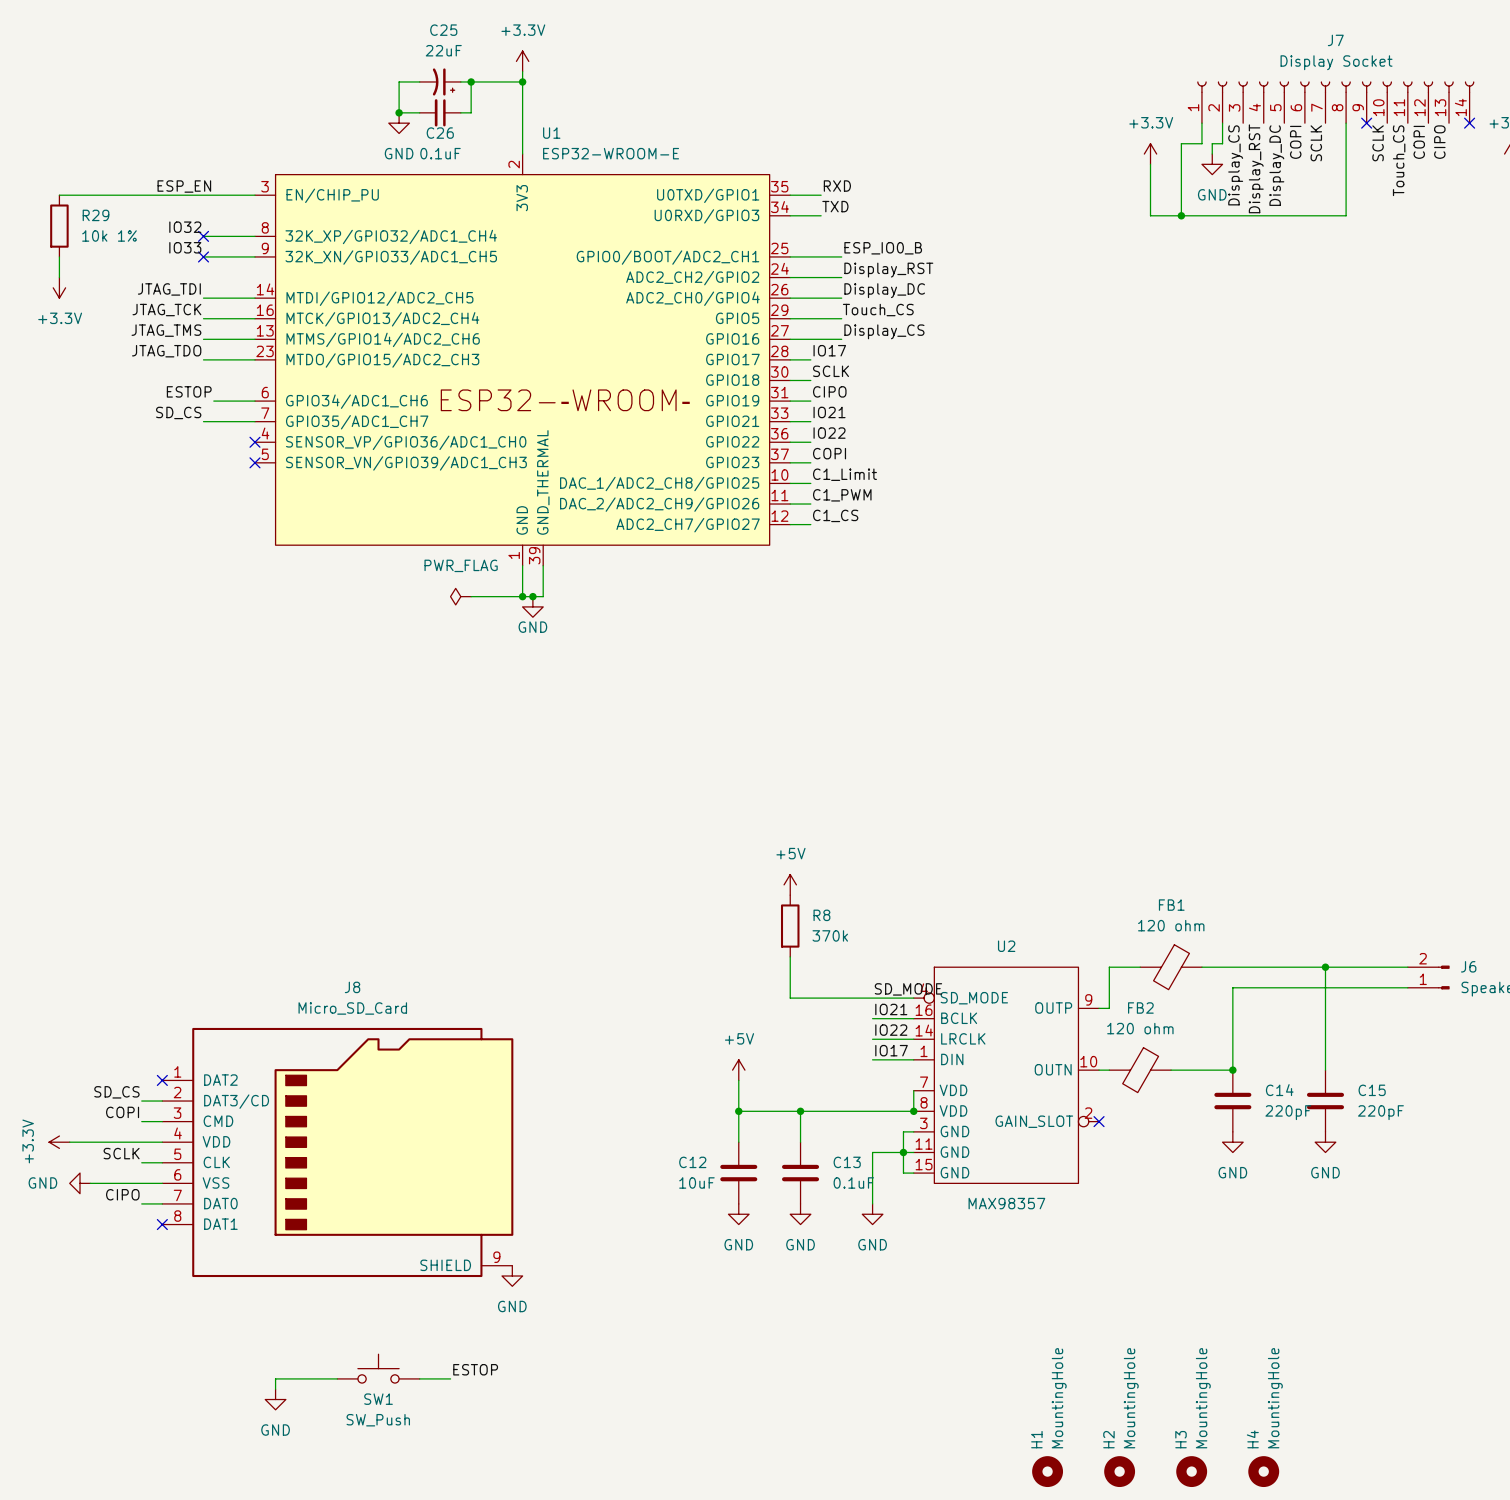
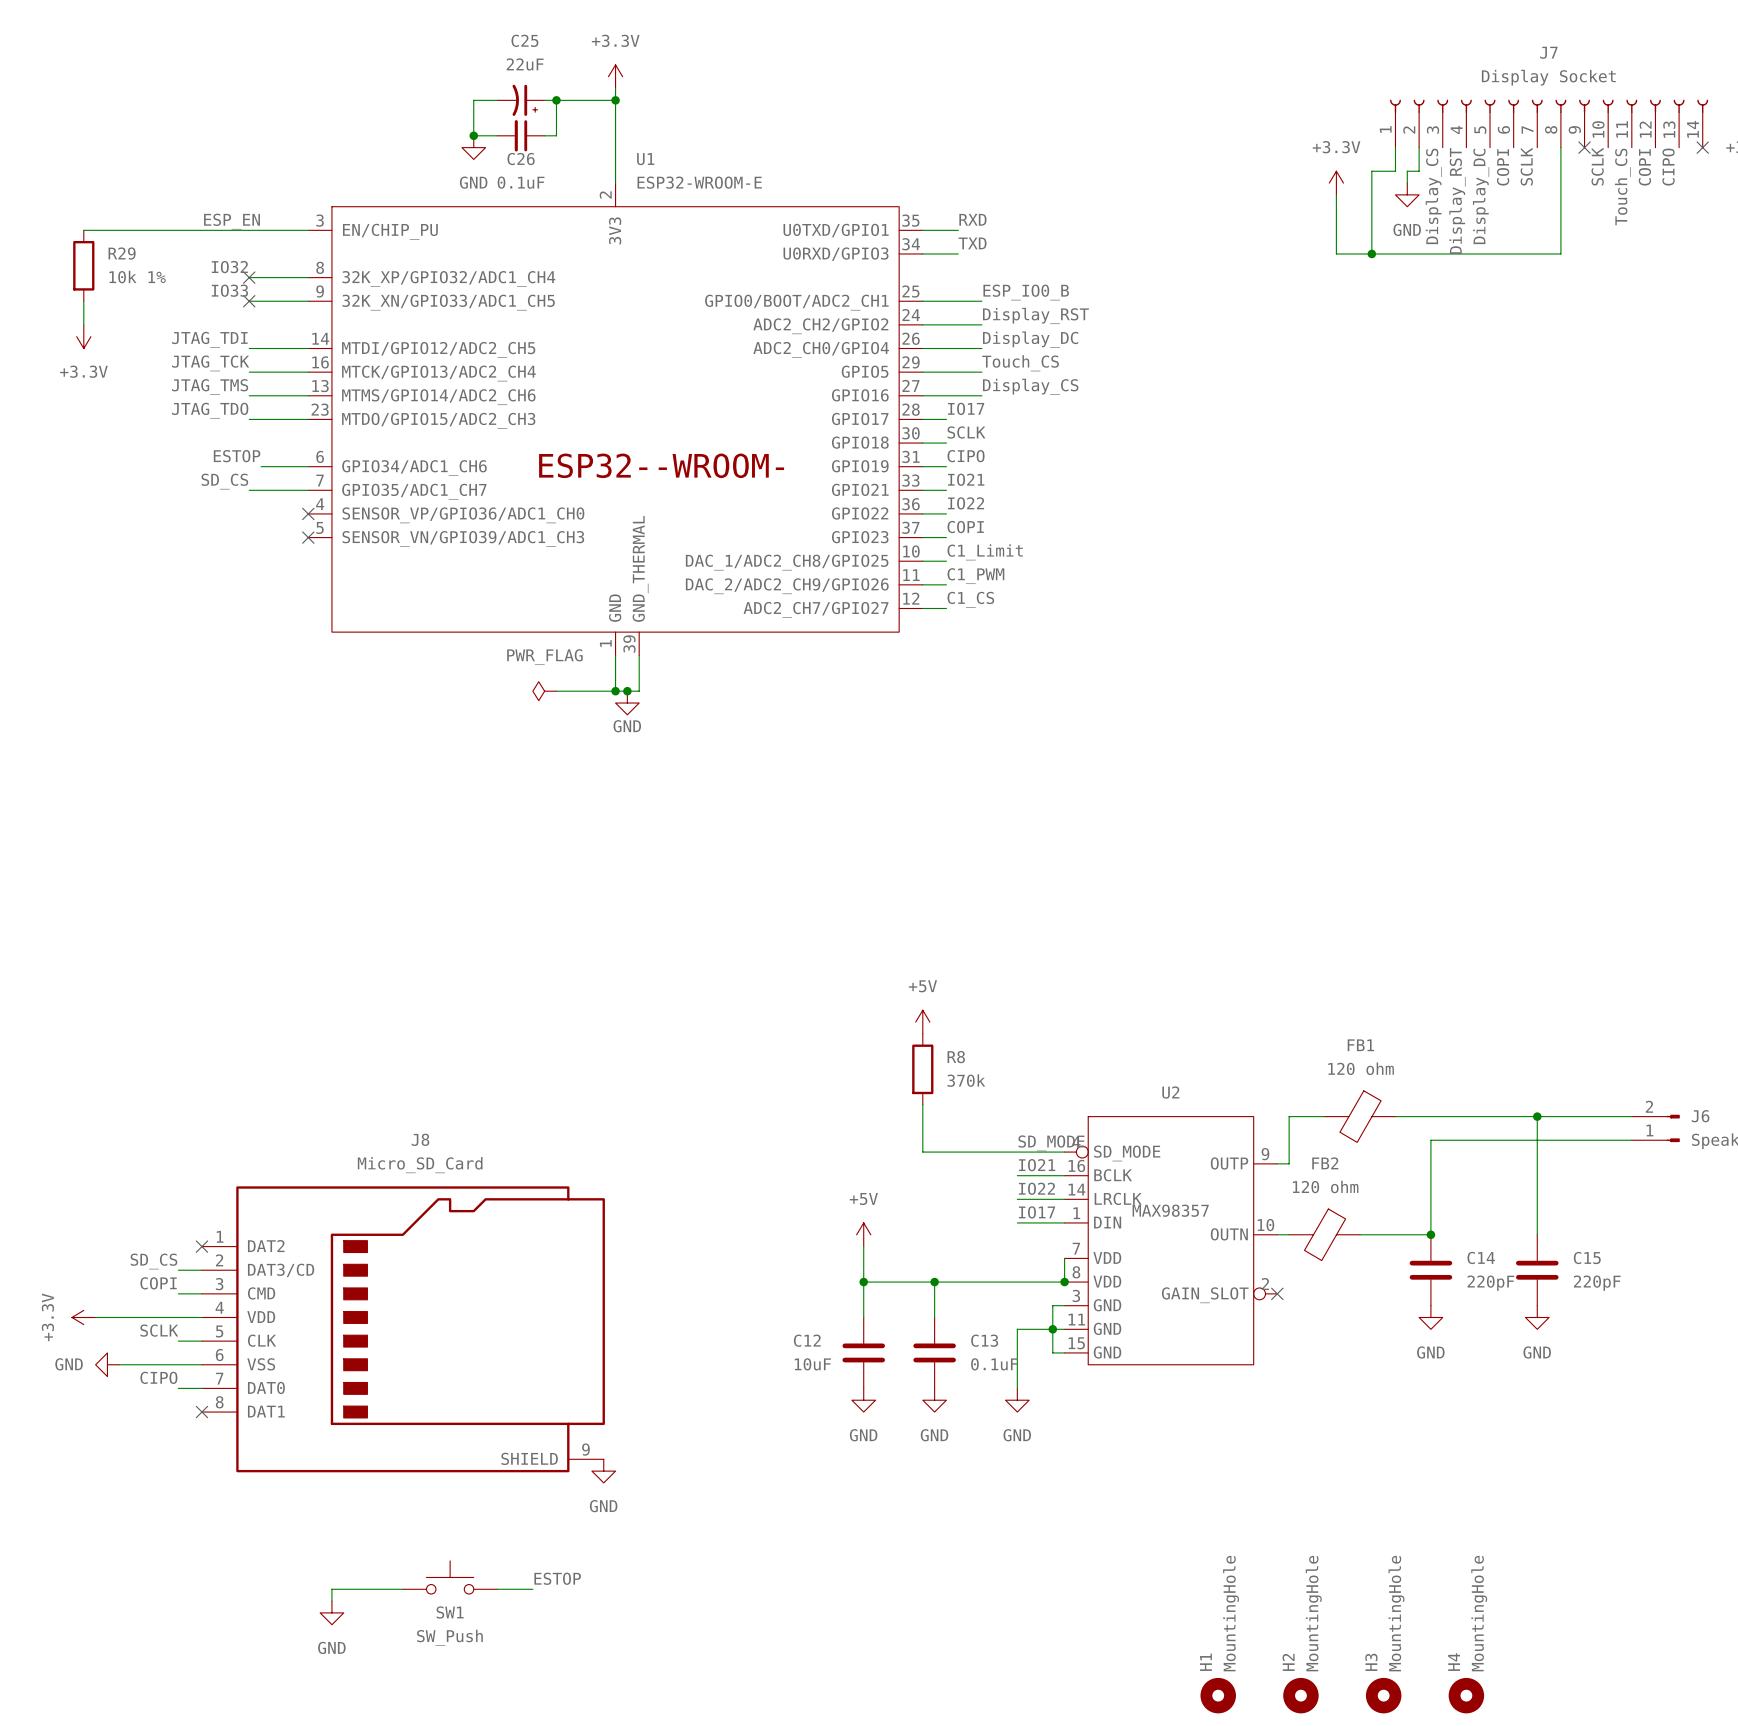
U2 value position: MAX98357 (1006, 1203) -> MAX98357 (1170, 1210)

